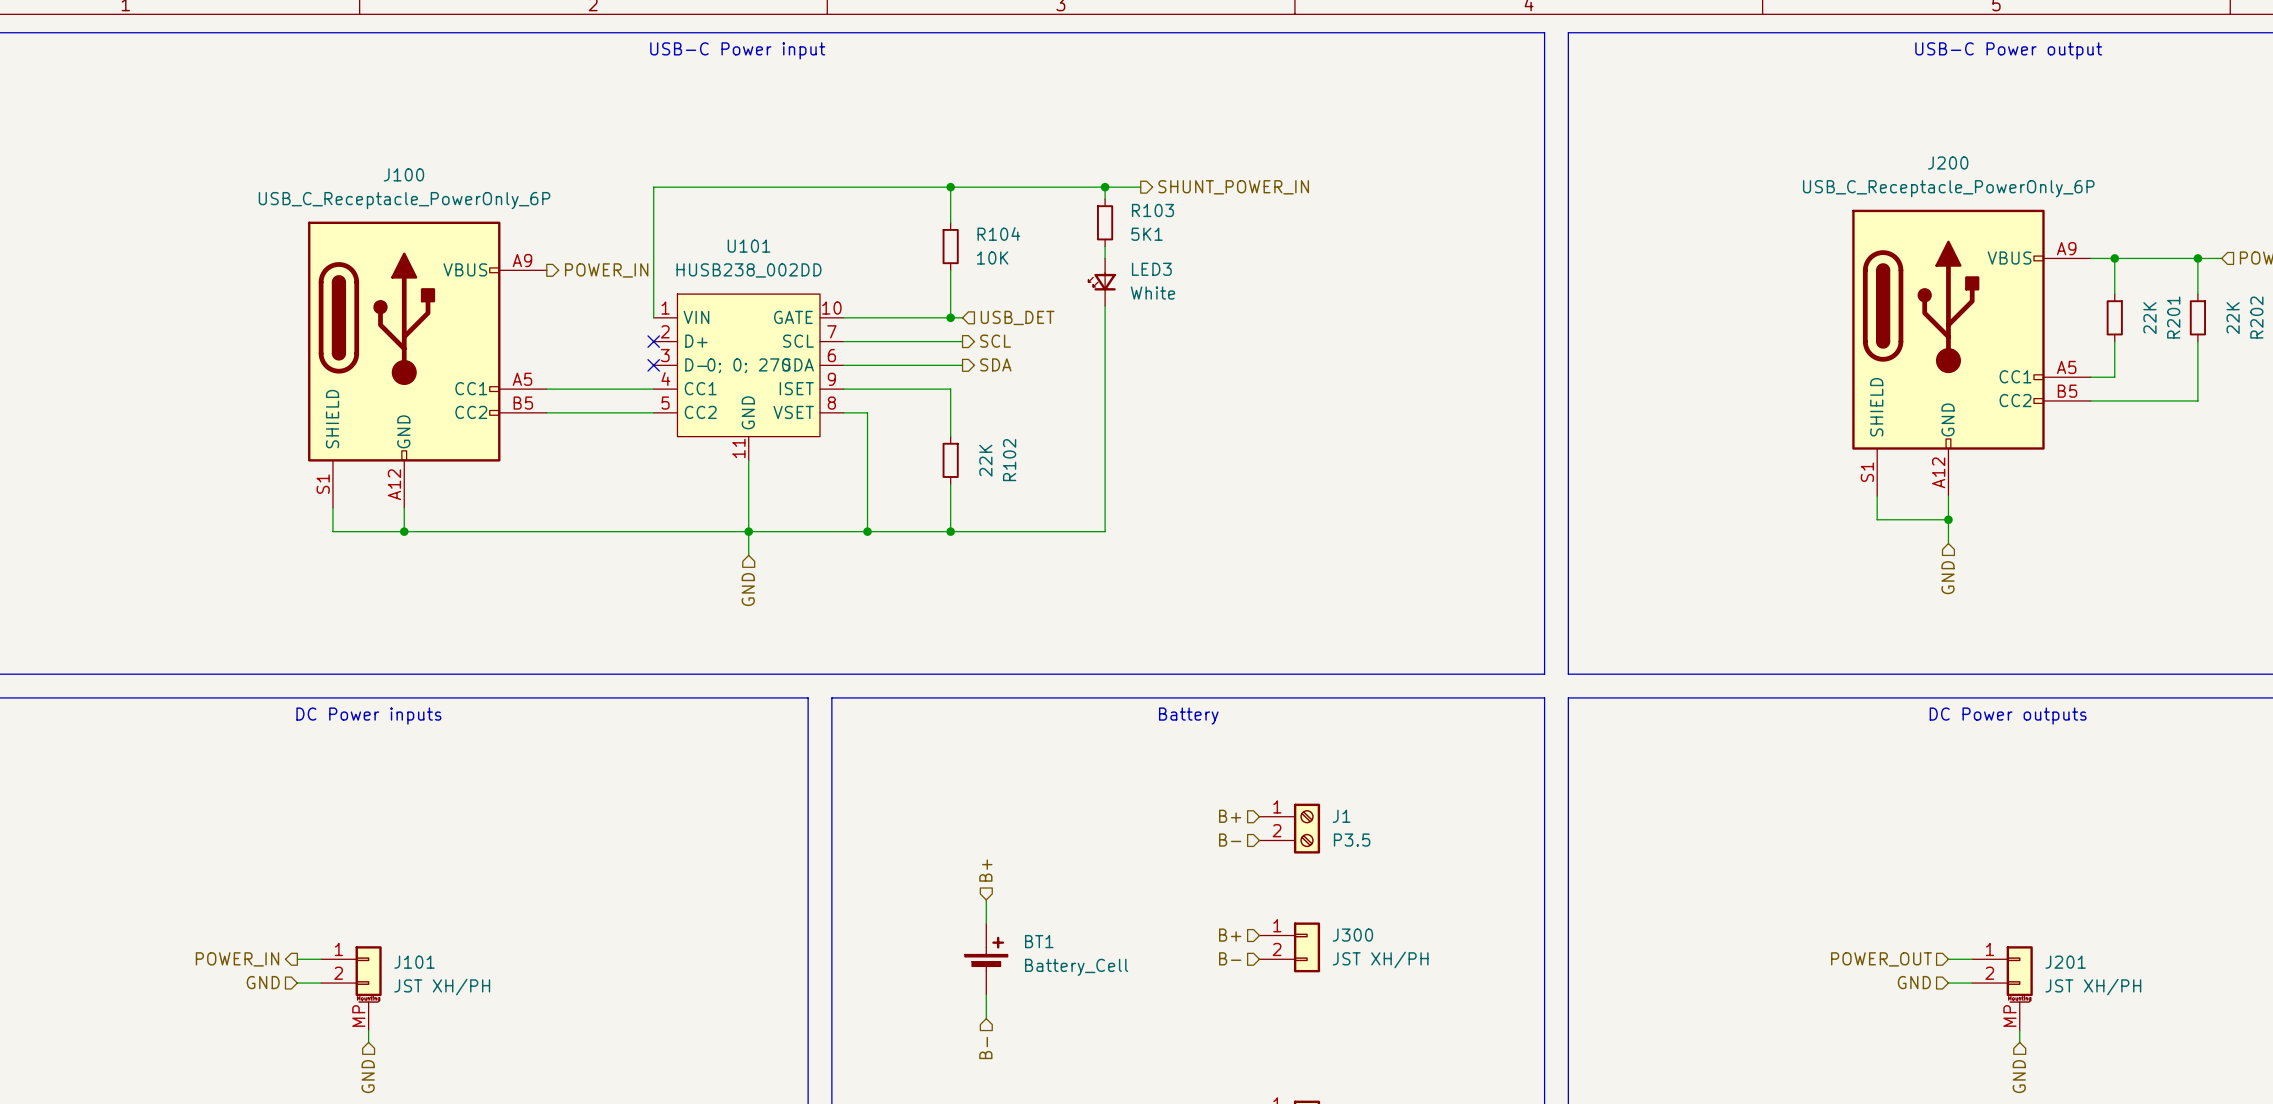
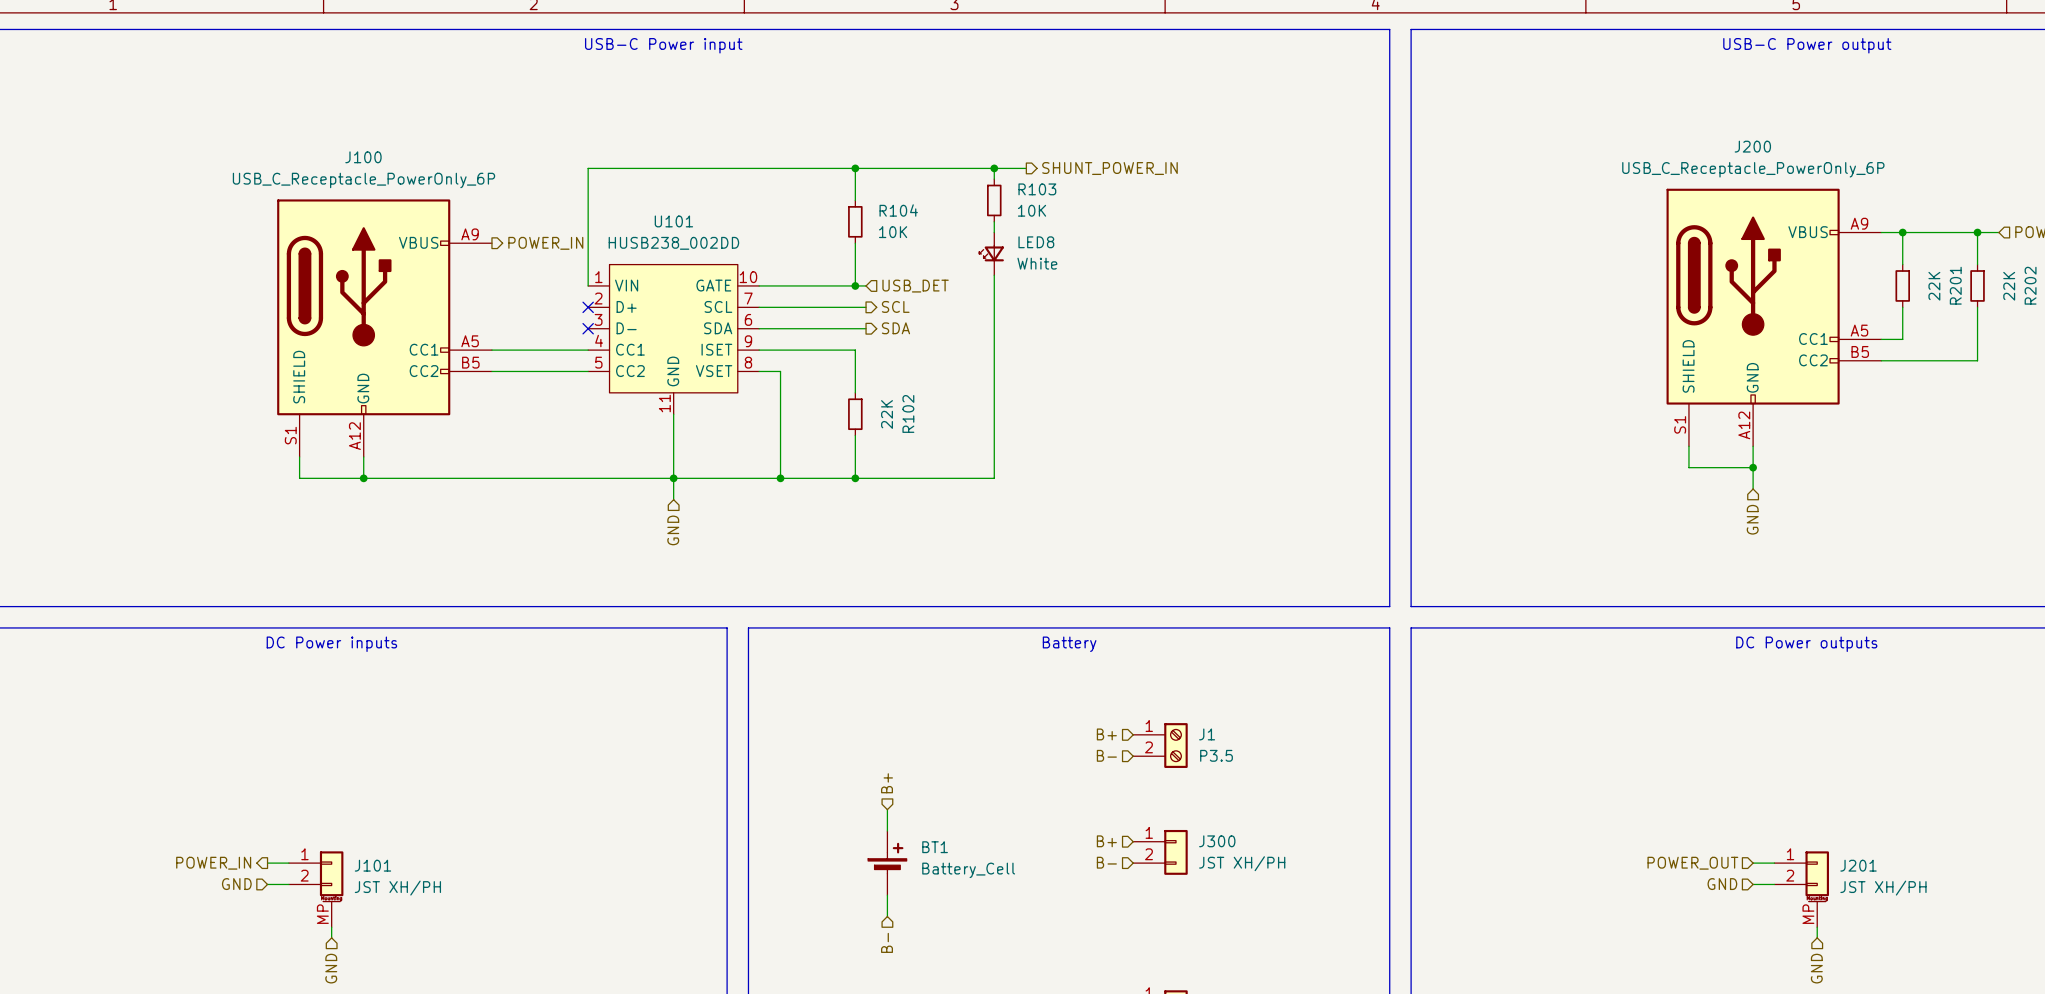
R103 value: 5K1 (1147, 234) -> 10K (1032, 210)
LED3 name: LED3 (1151, 269) -> LED8 (1036, 242)
U101 text: 0; 0; 270 (748, 365) -> none

